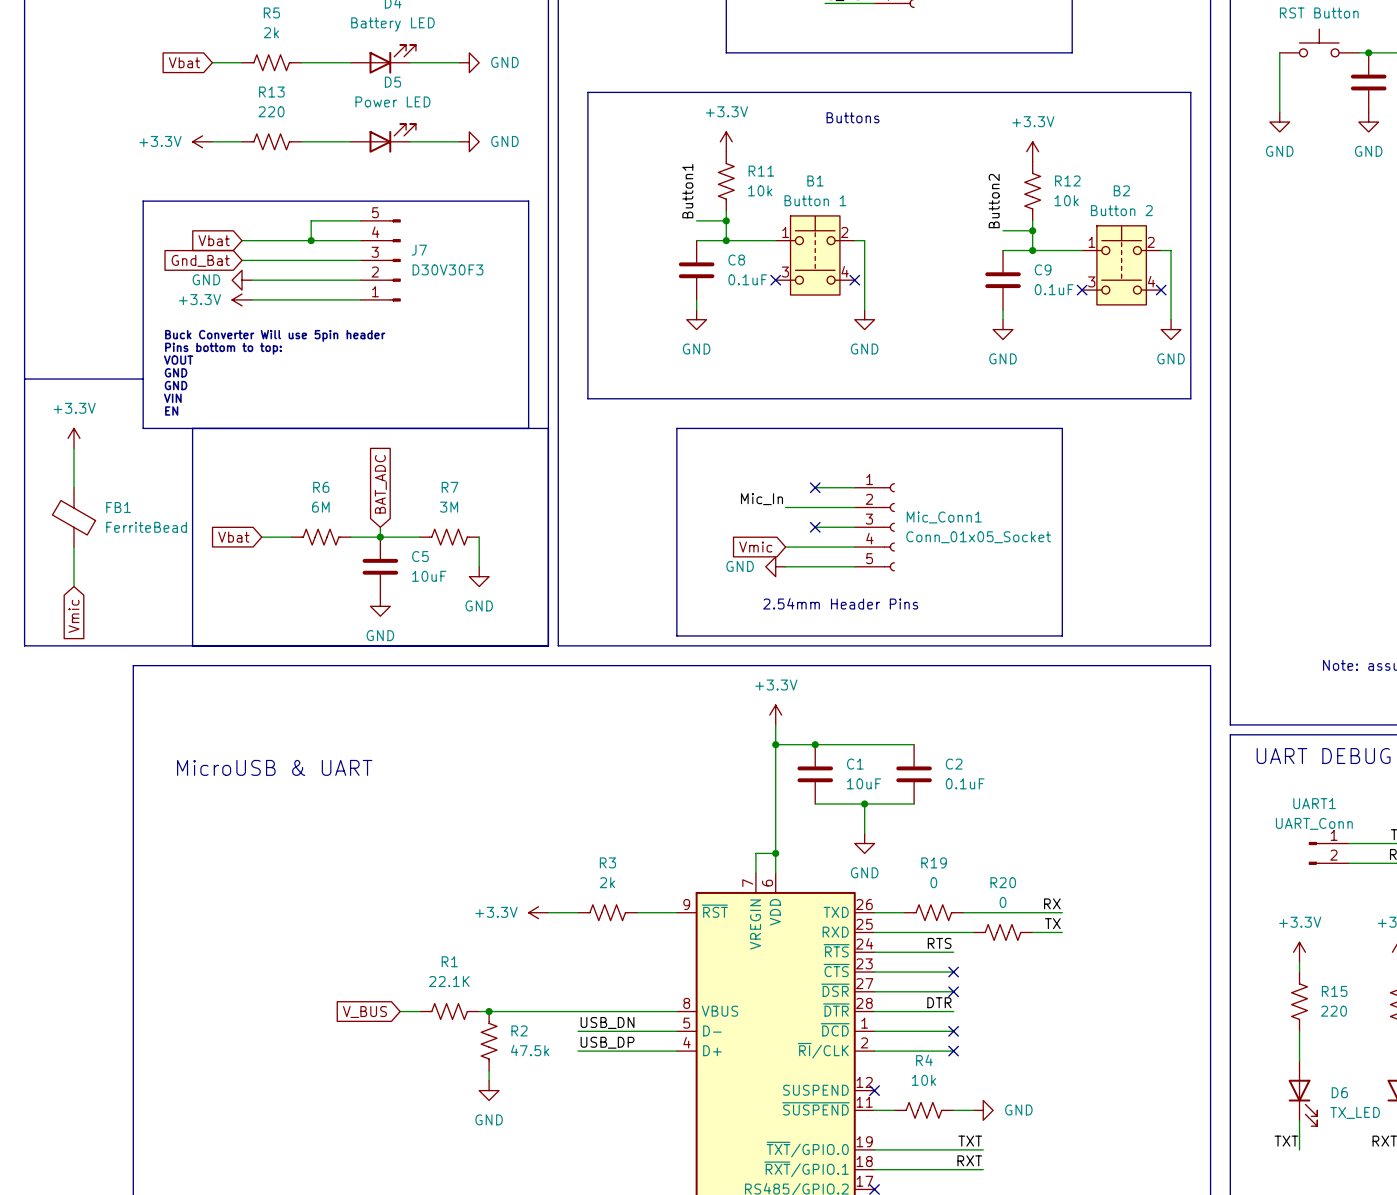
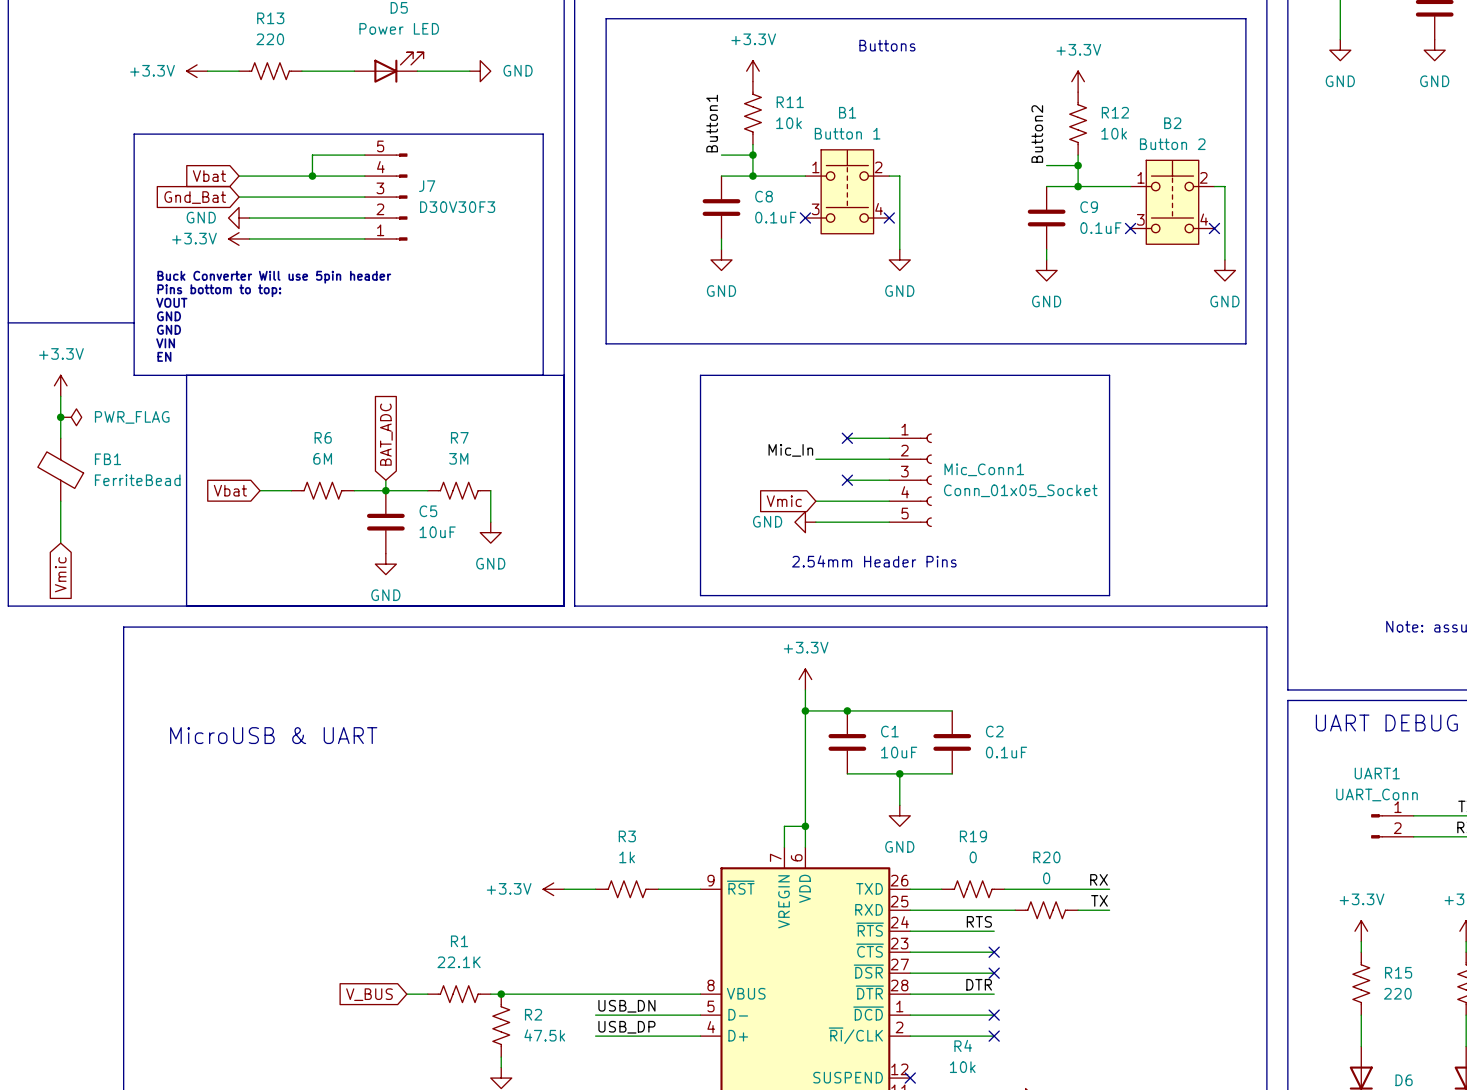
junction: none -> (60, 417)
power symbol: none -> PWR_FLAG (71, 417)
R3 value: 2k (607, 882) -> 1k (627, 857)

